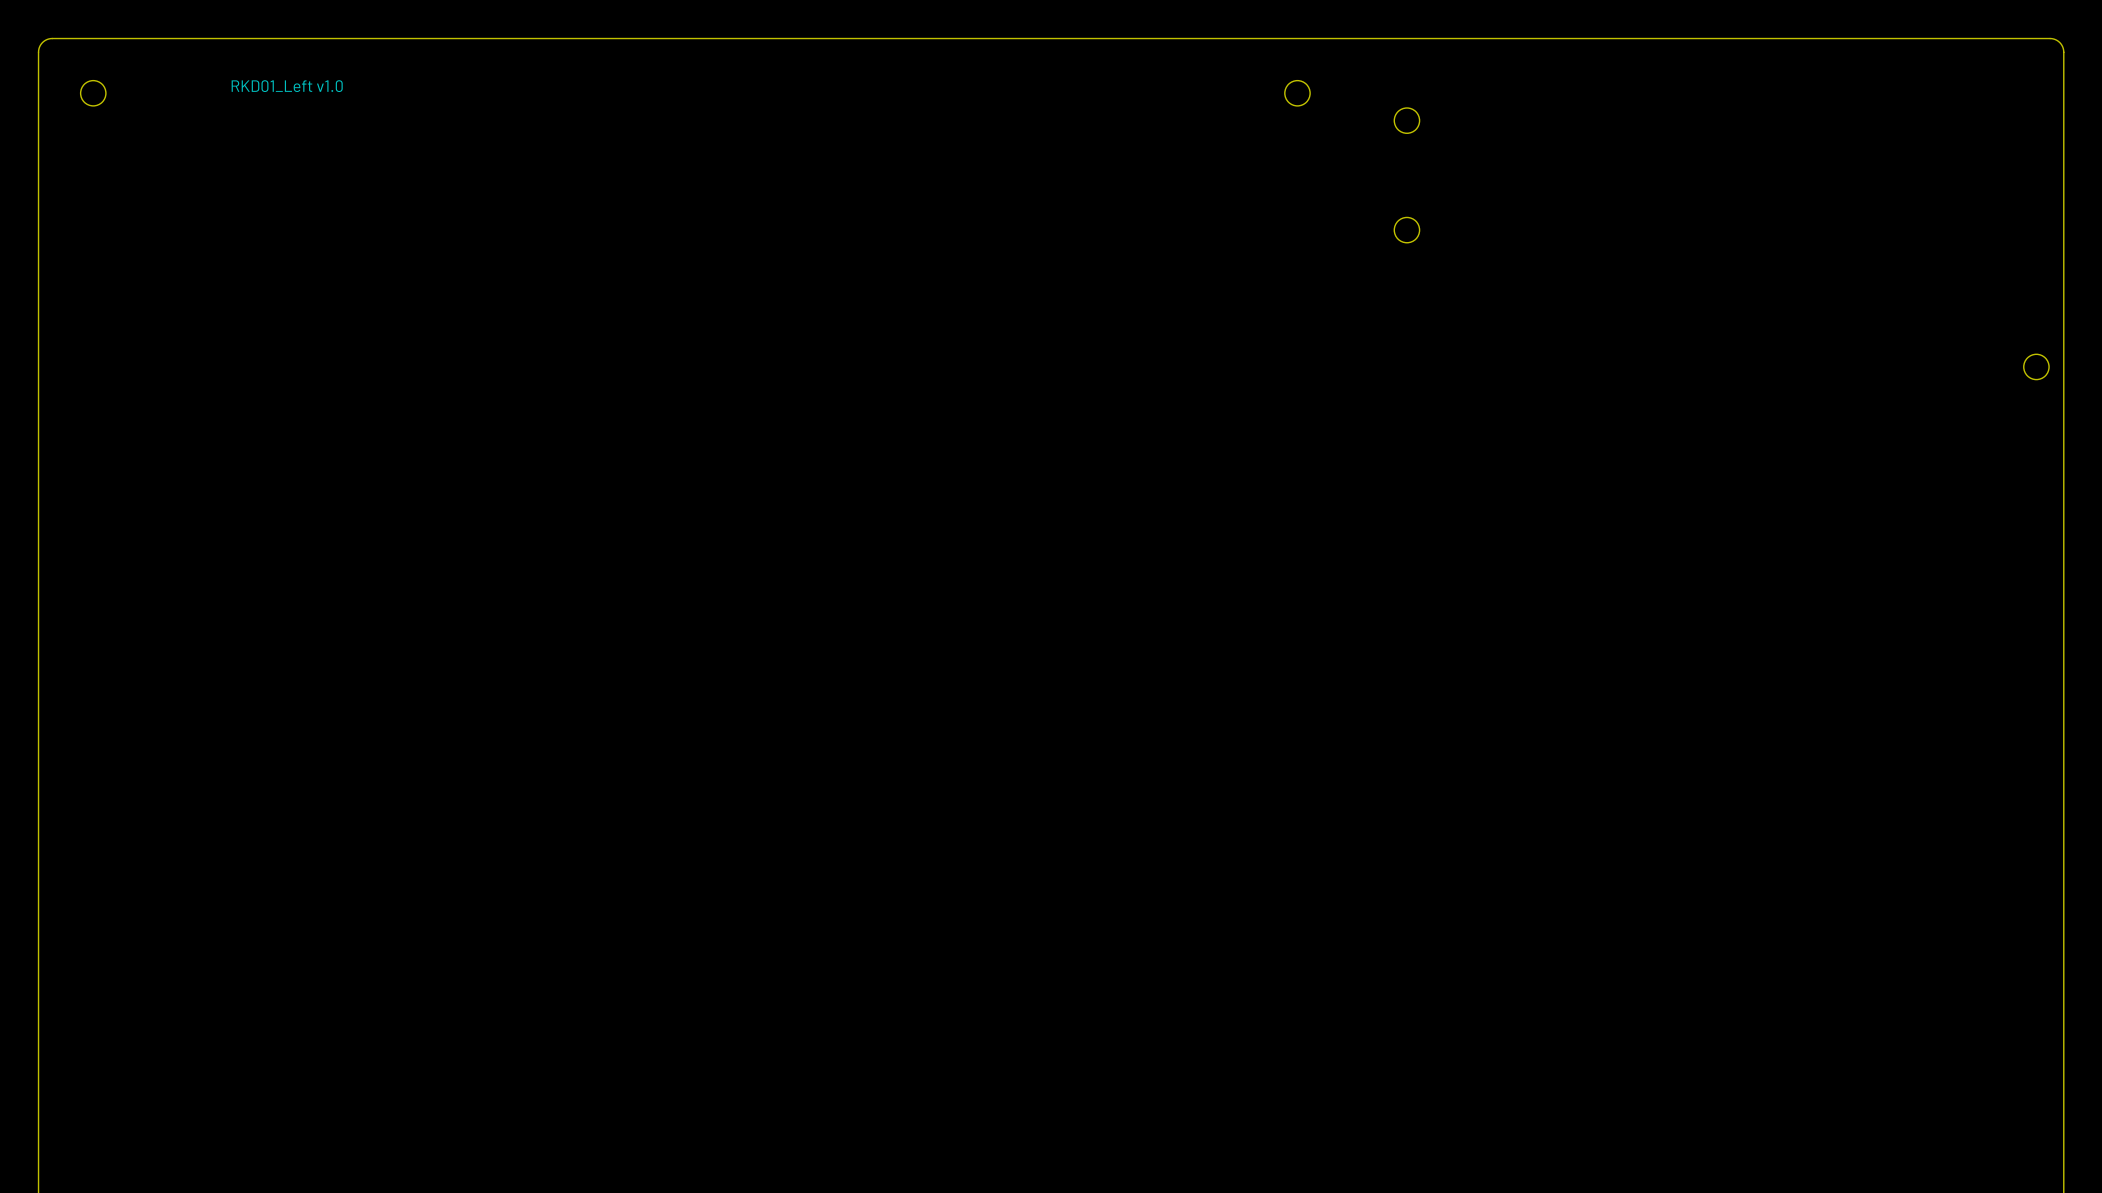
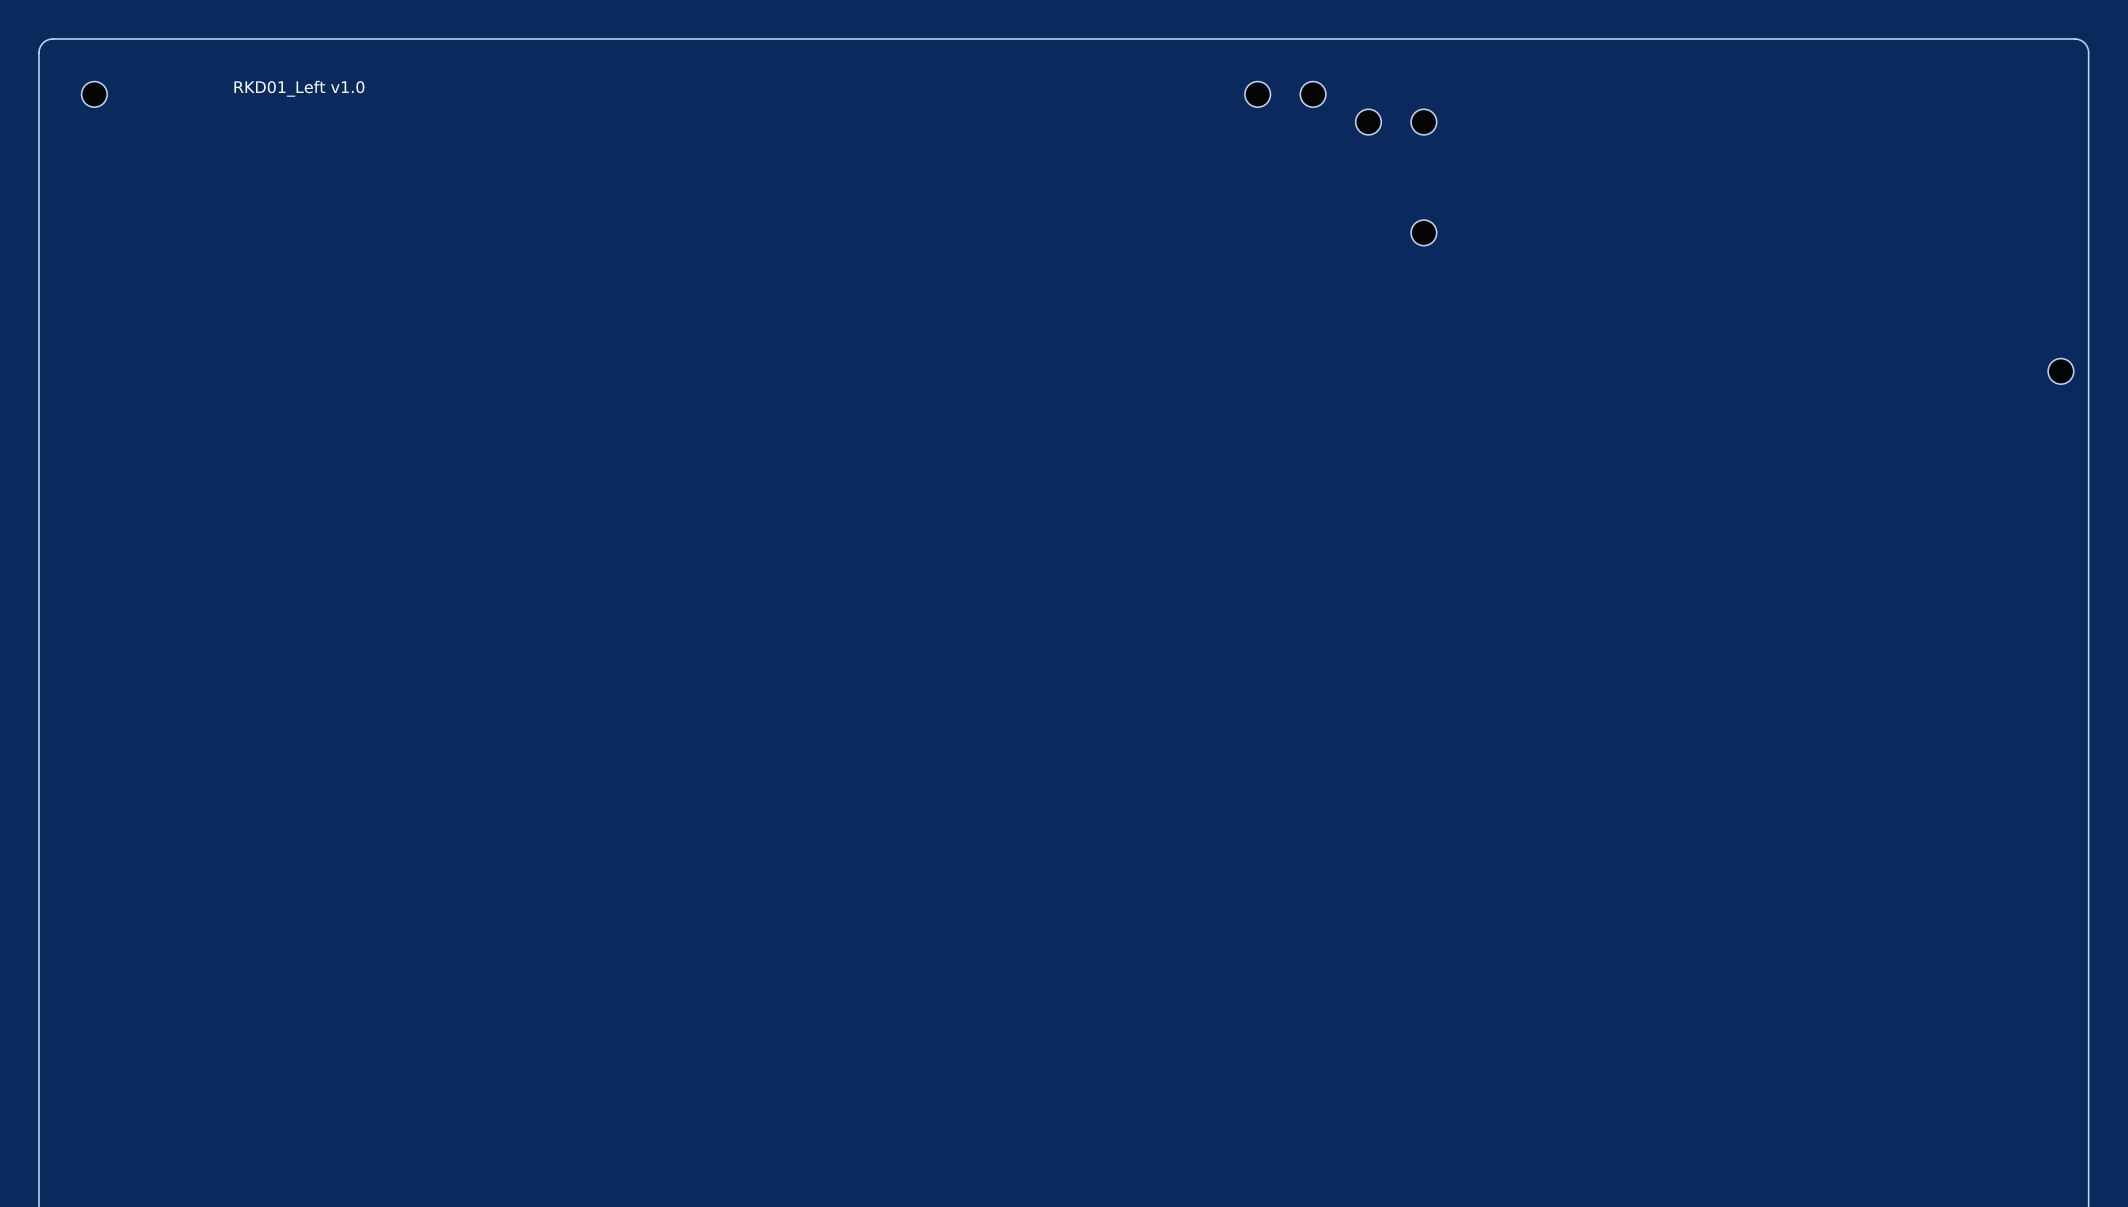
part: none -> (1257, 94)
part: none -> (1368, 122)

